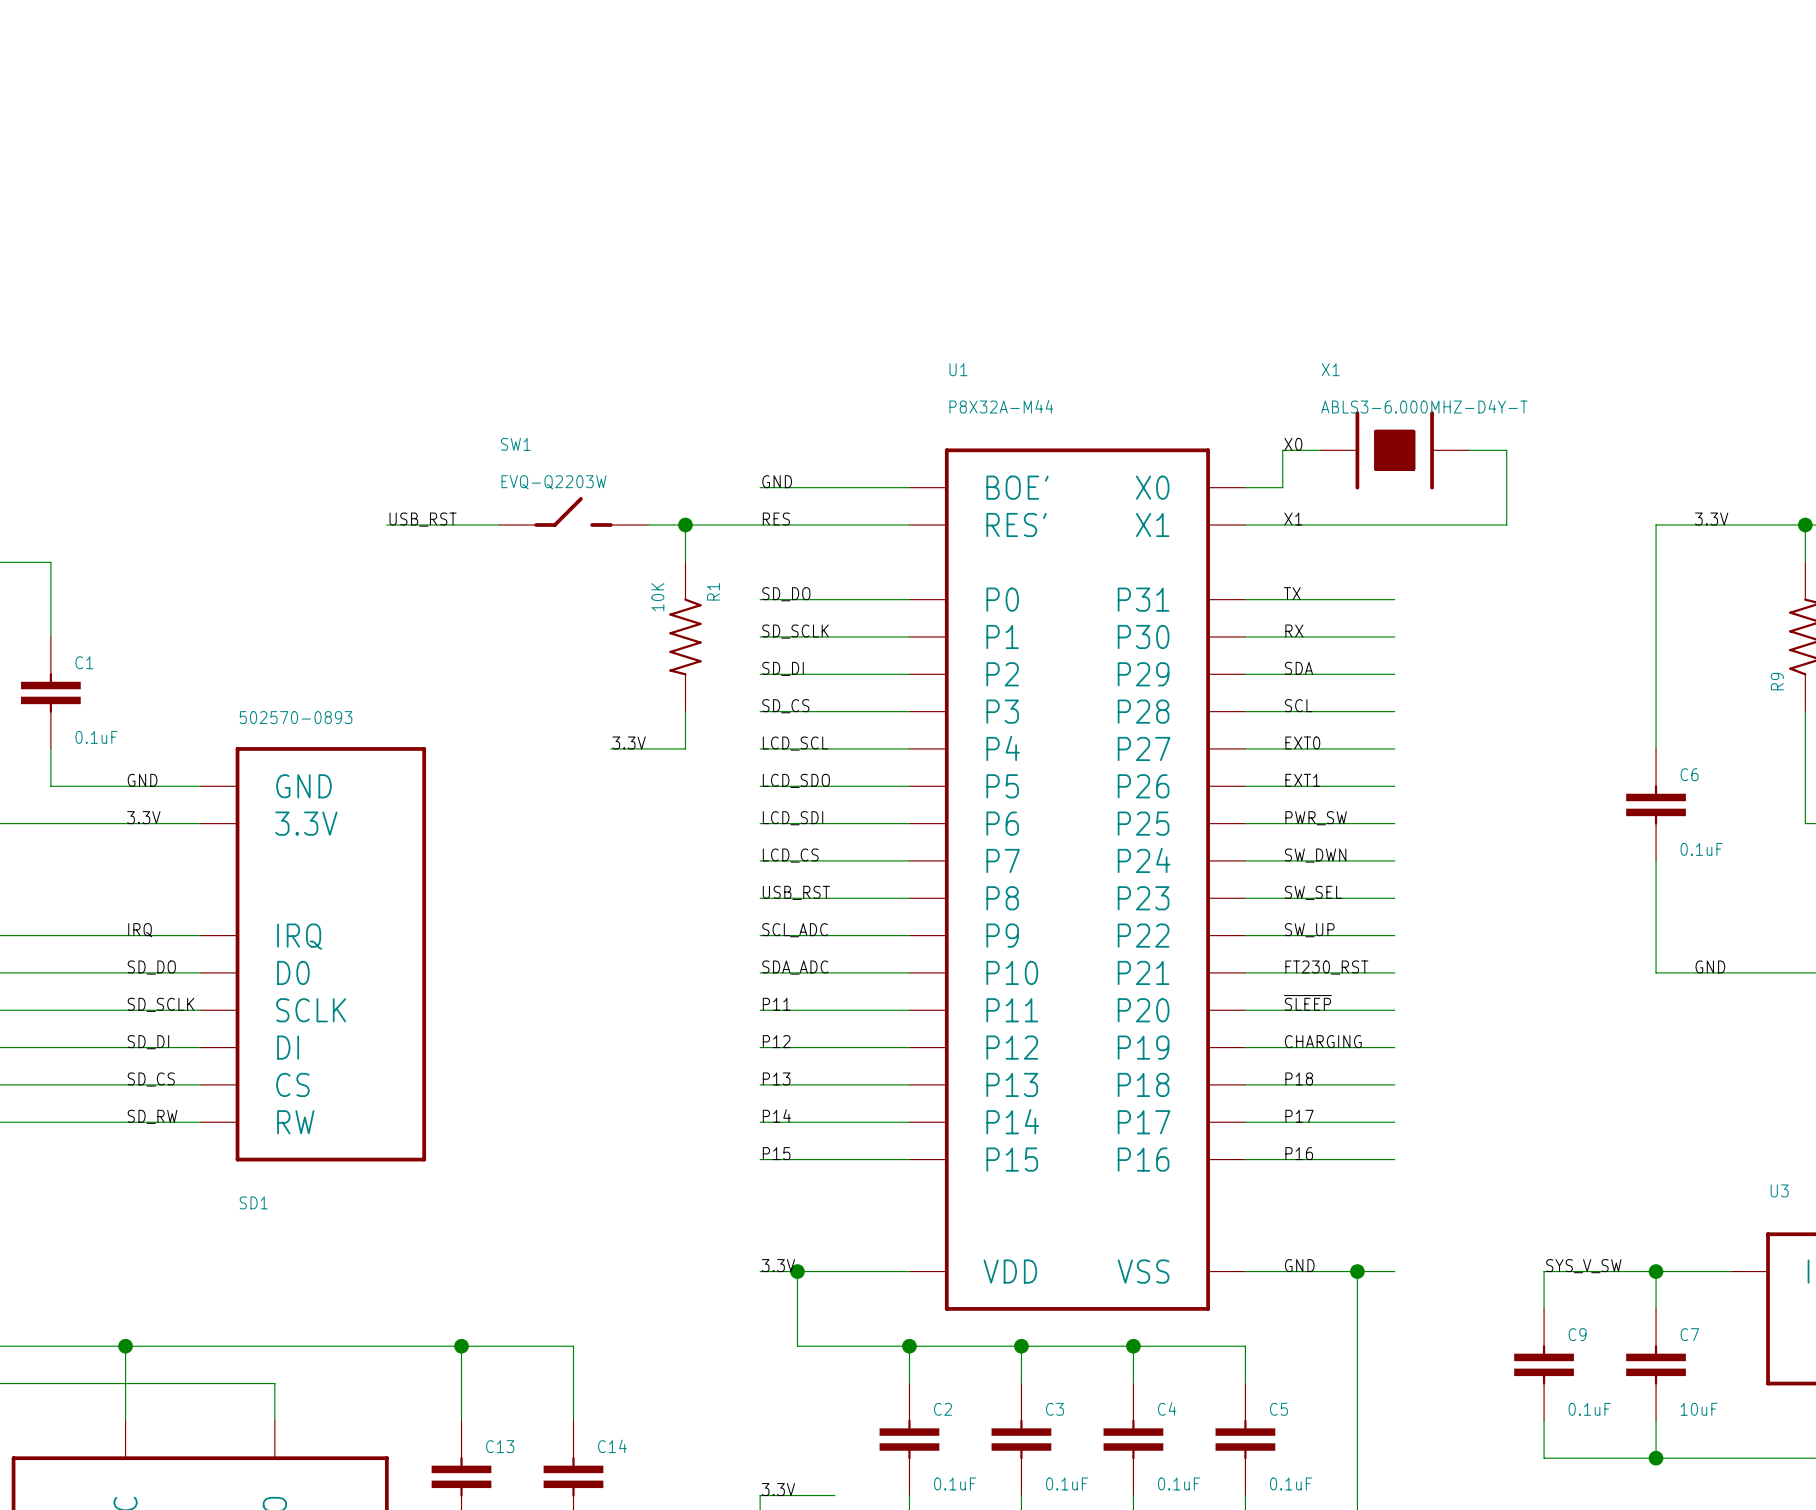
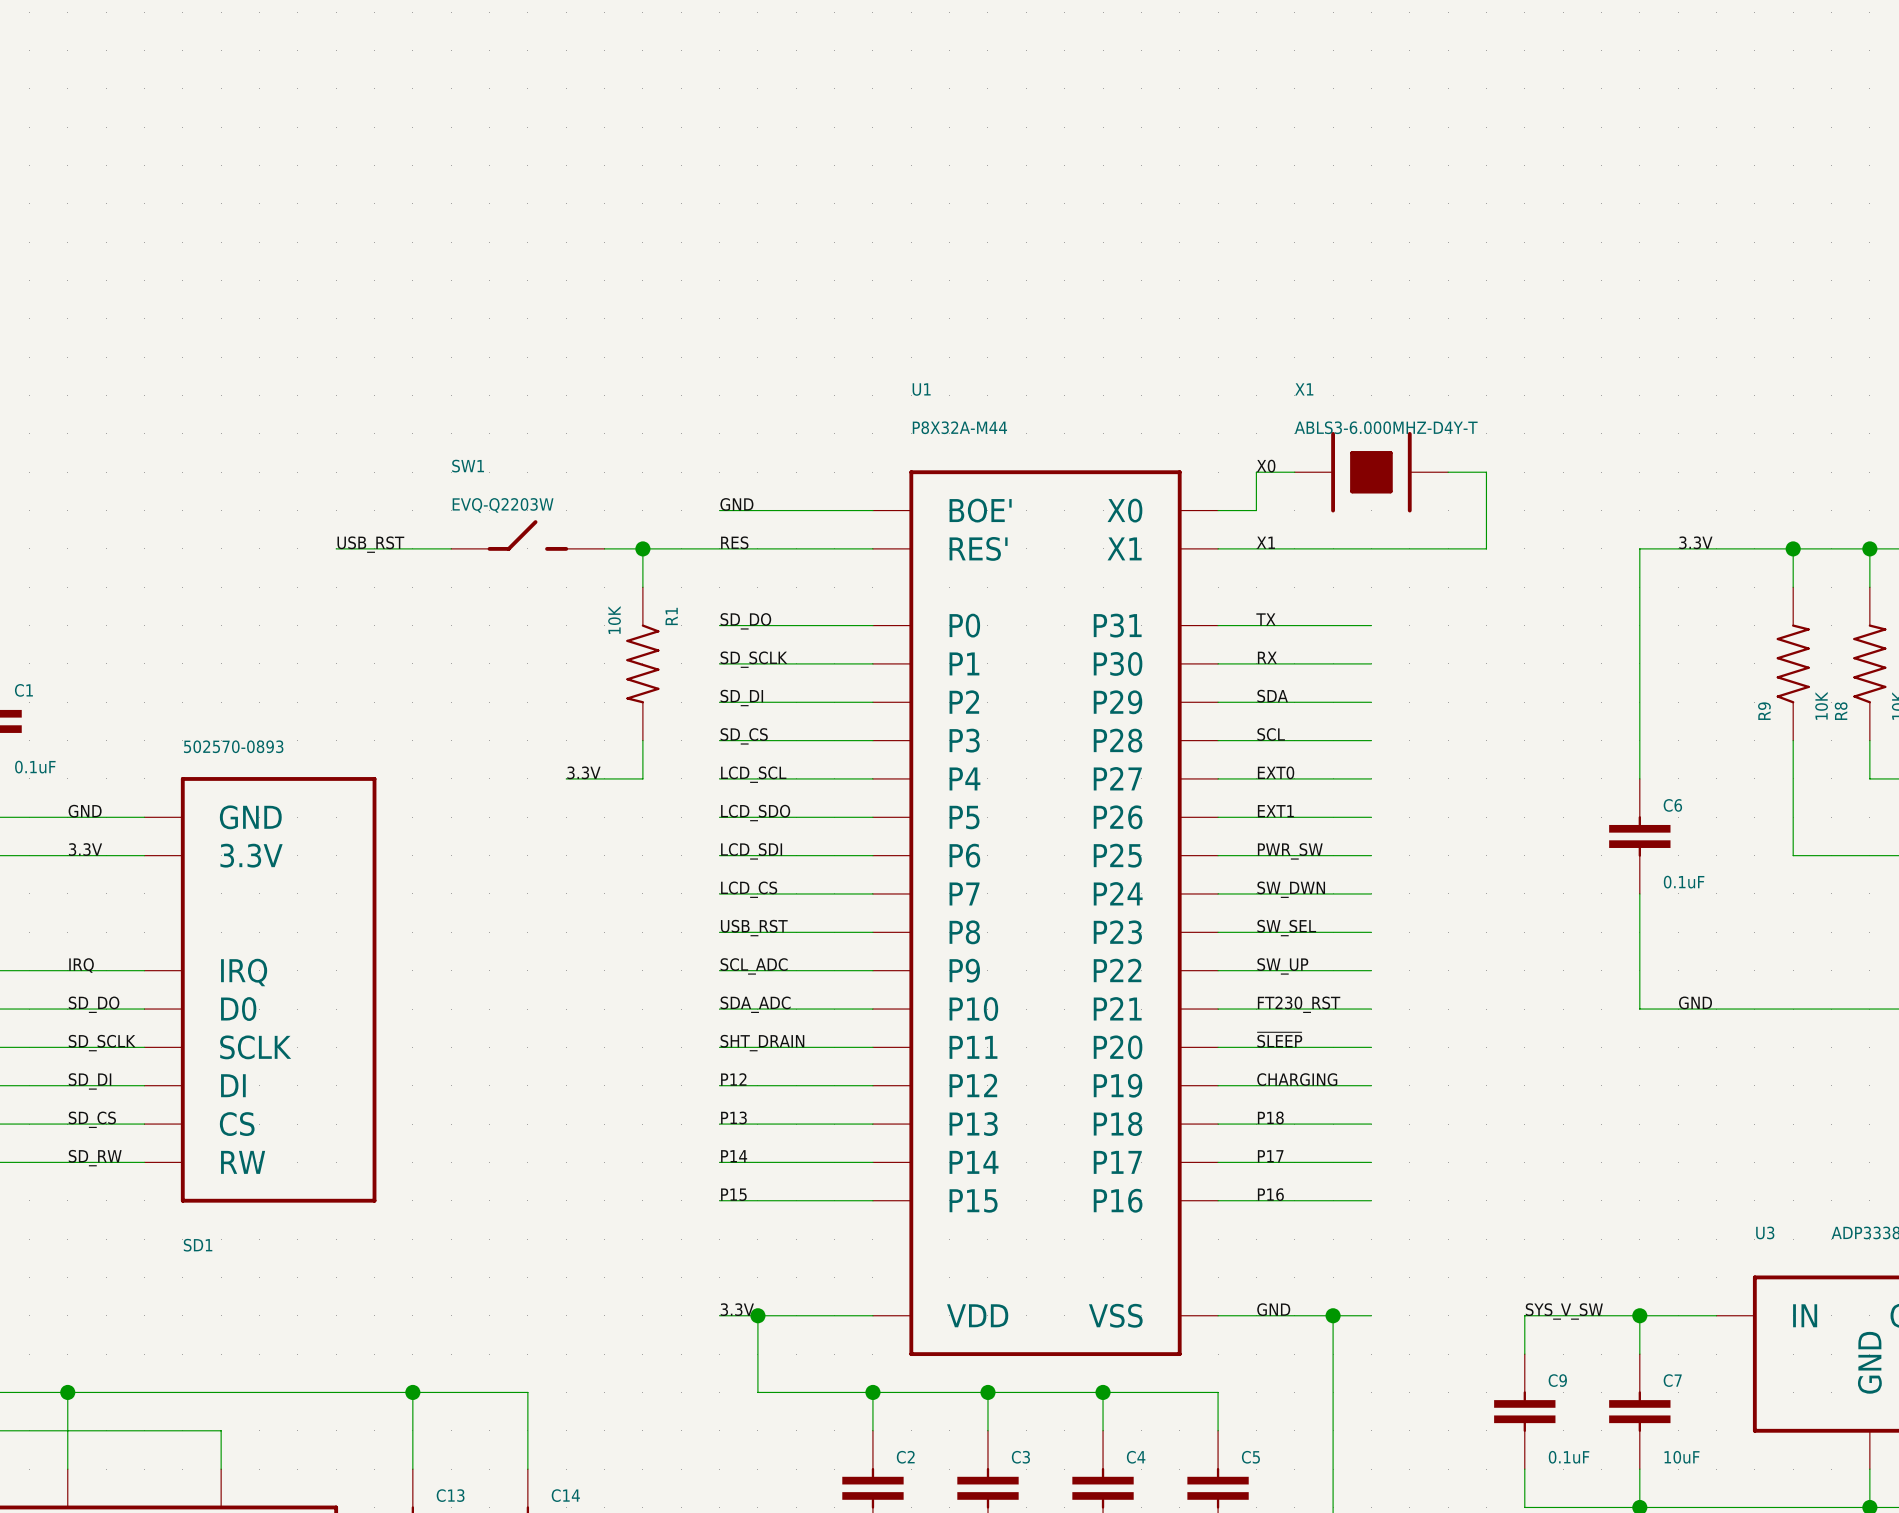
label: P11 (776, 1004) -> SHT_DRAIN (762, 1043)

